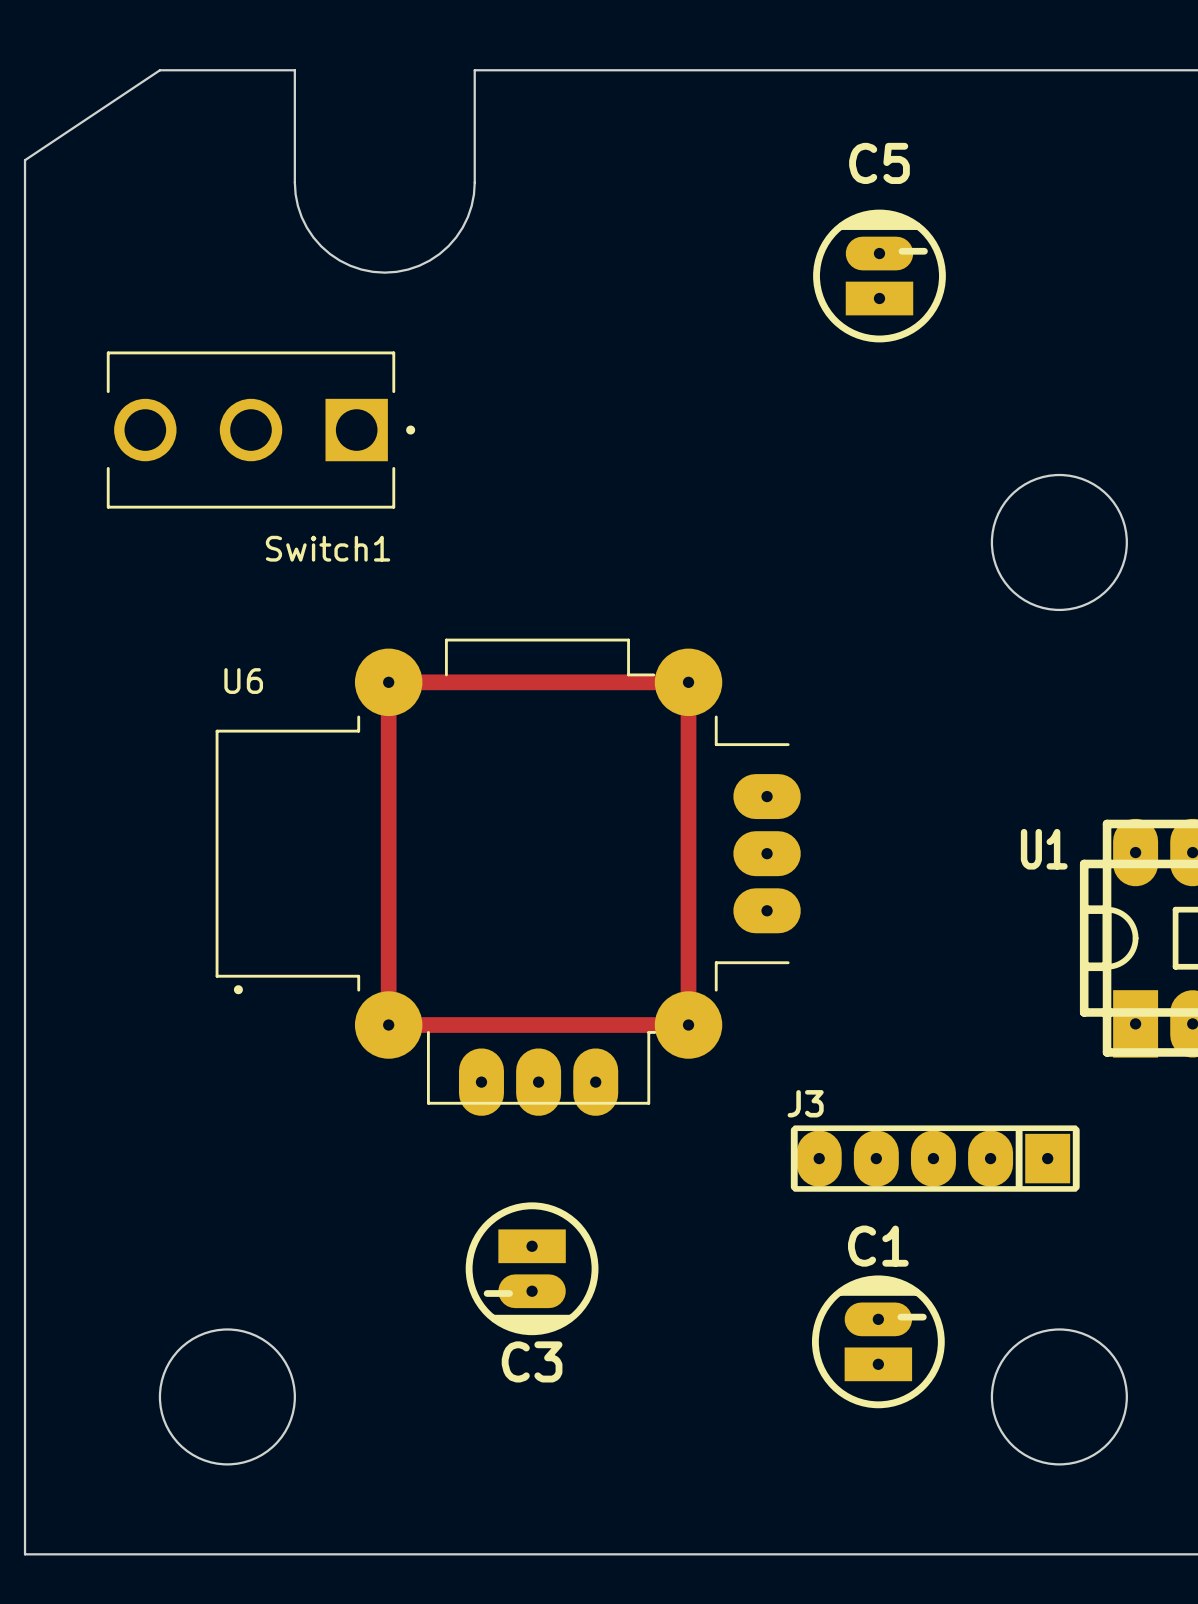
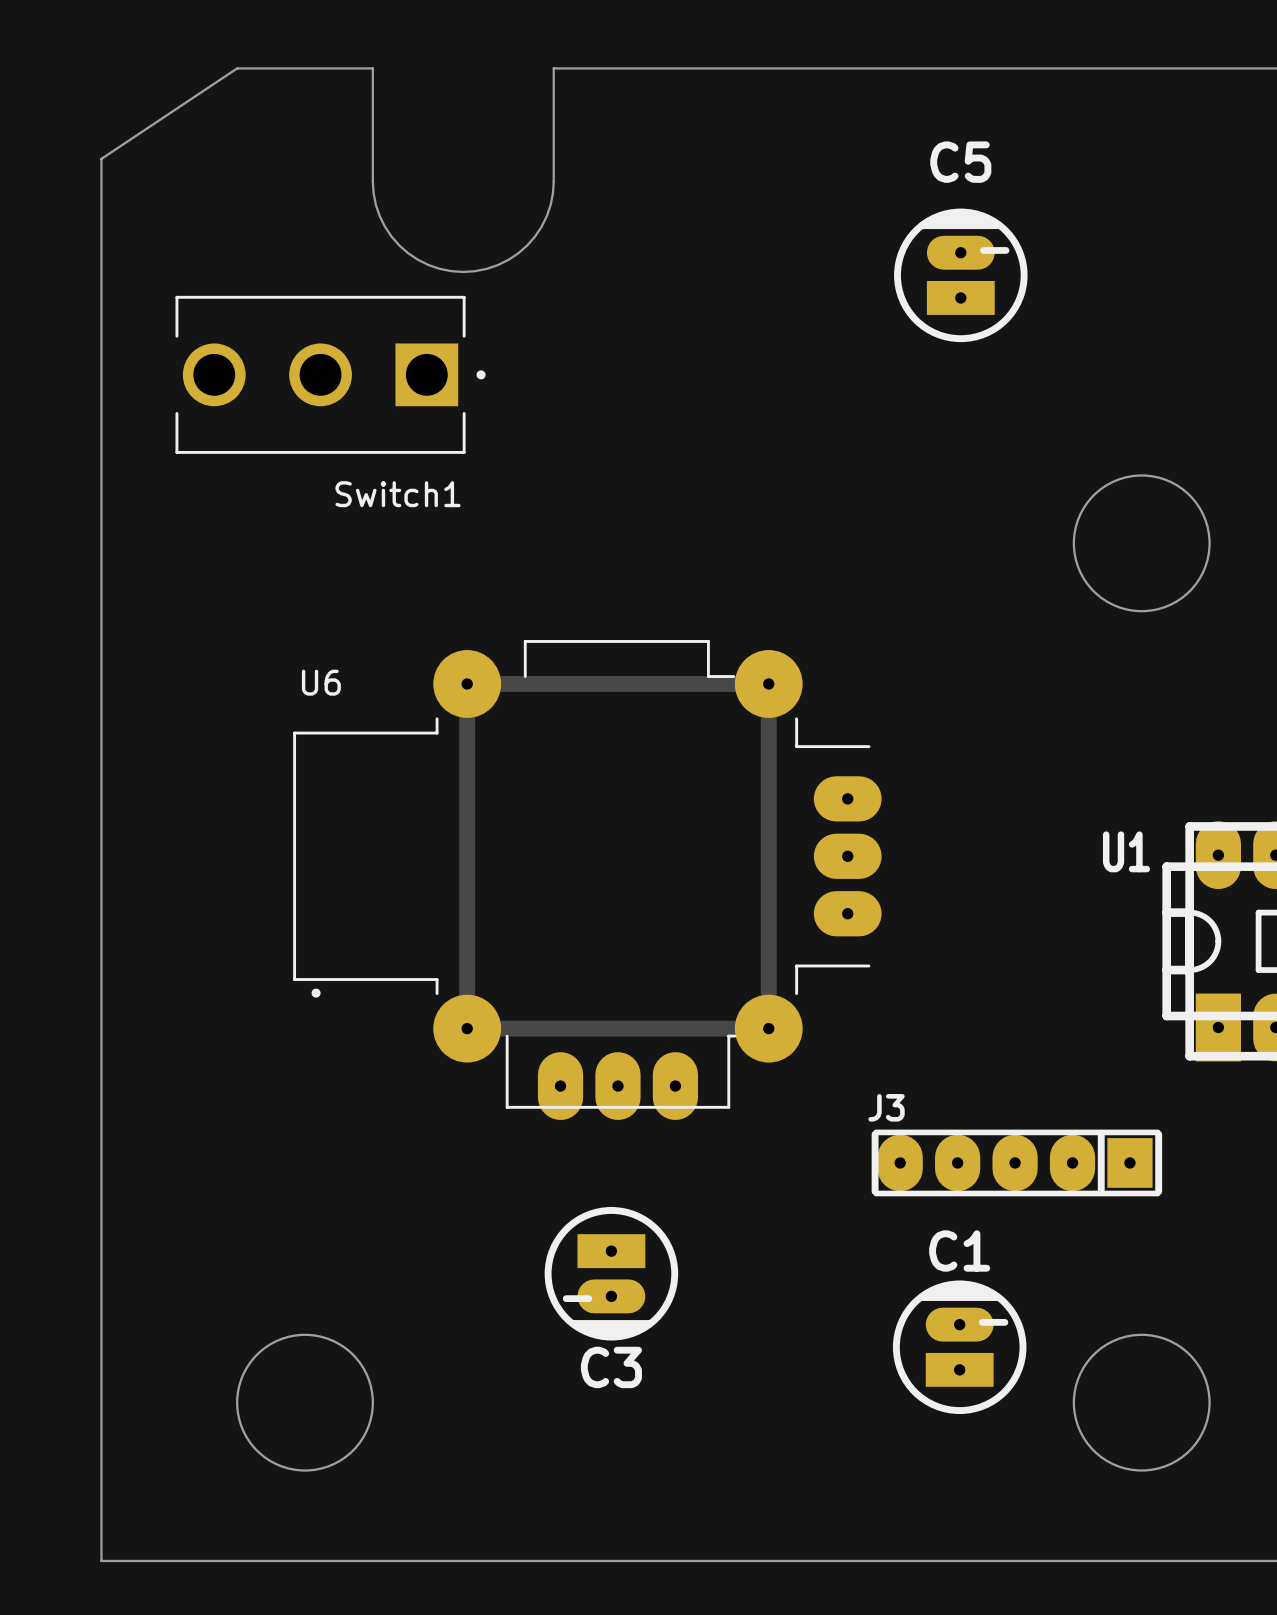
Switch1 position: (260, 430) -> (330, 374)

